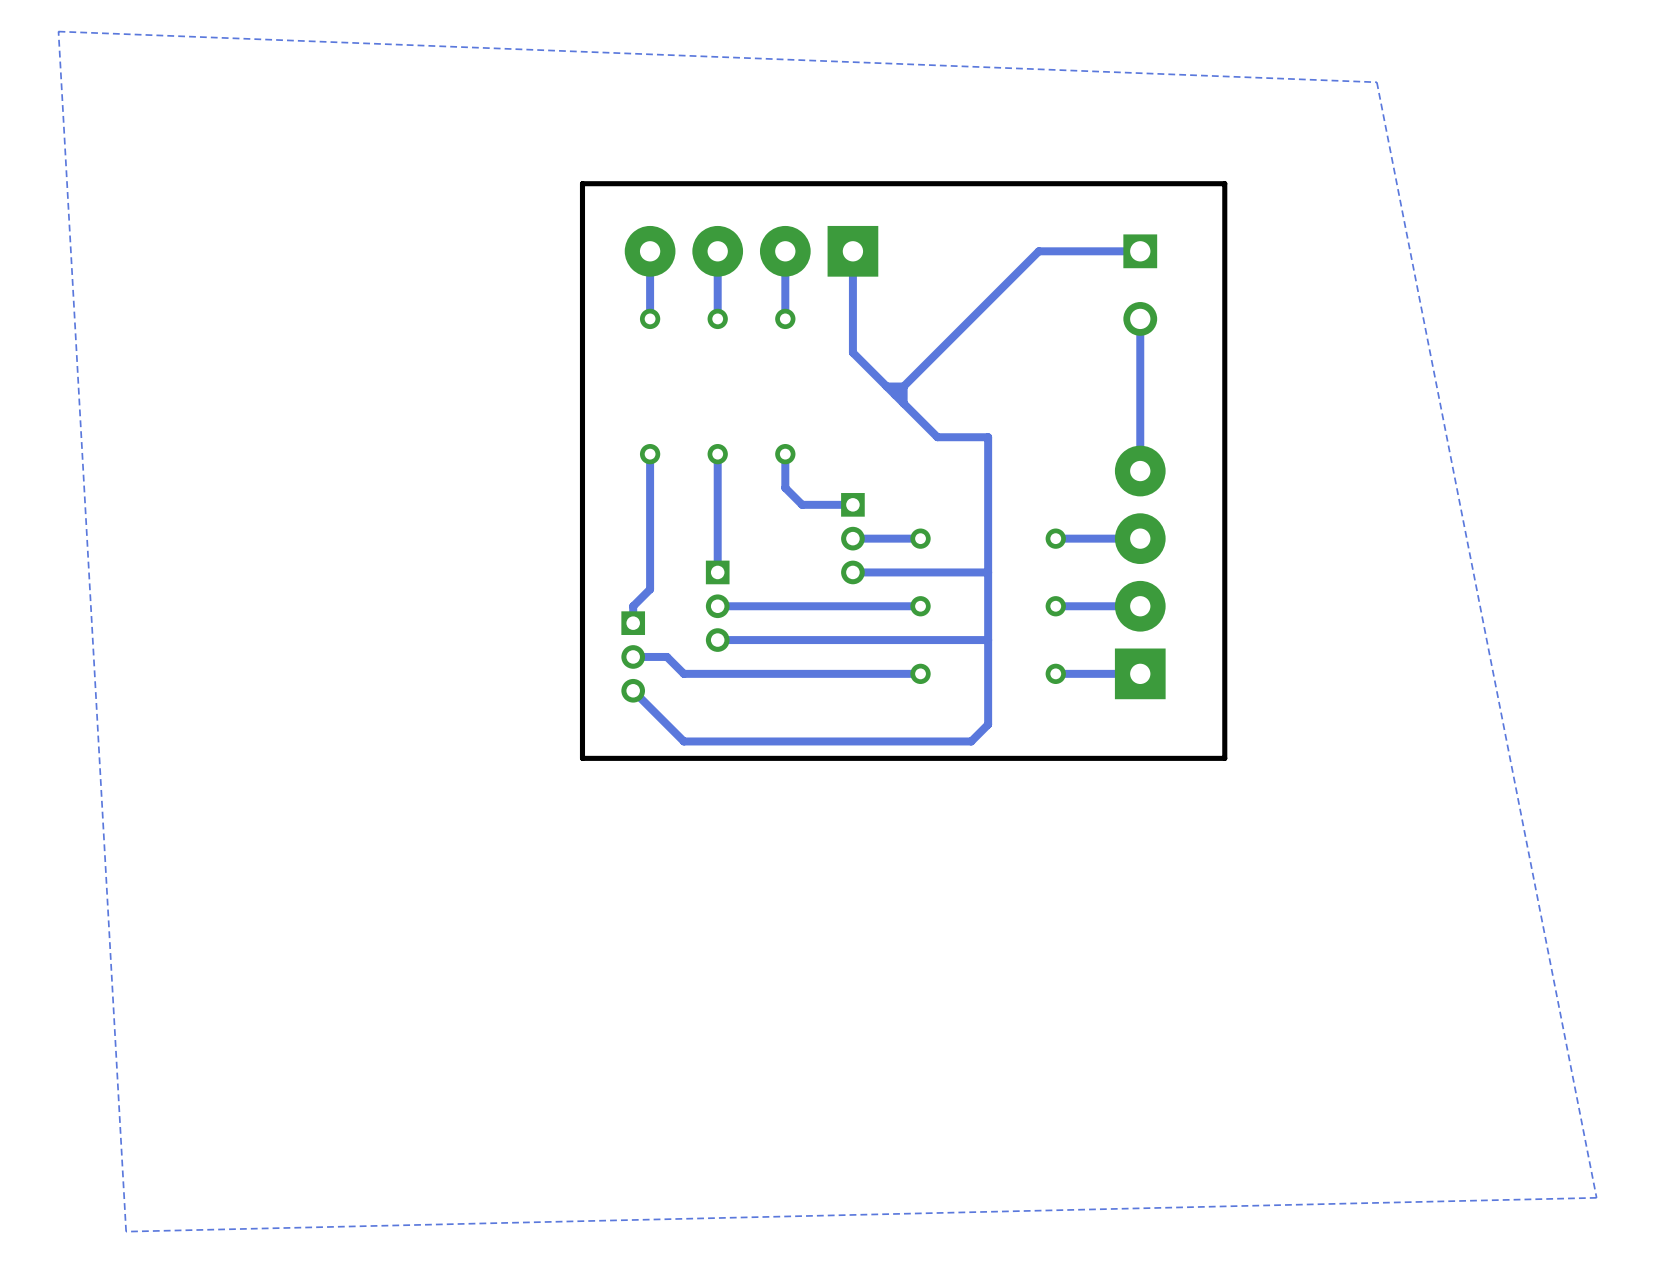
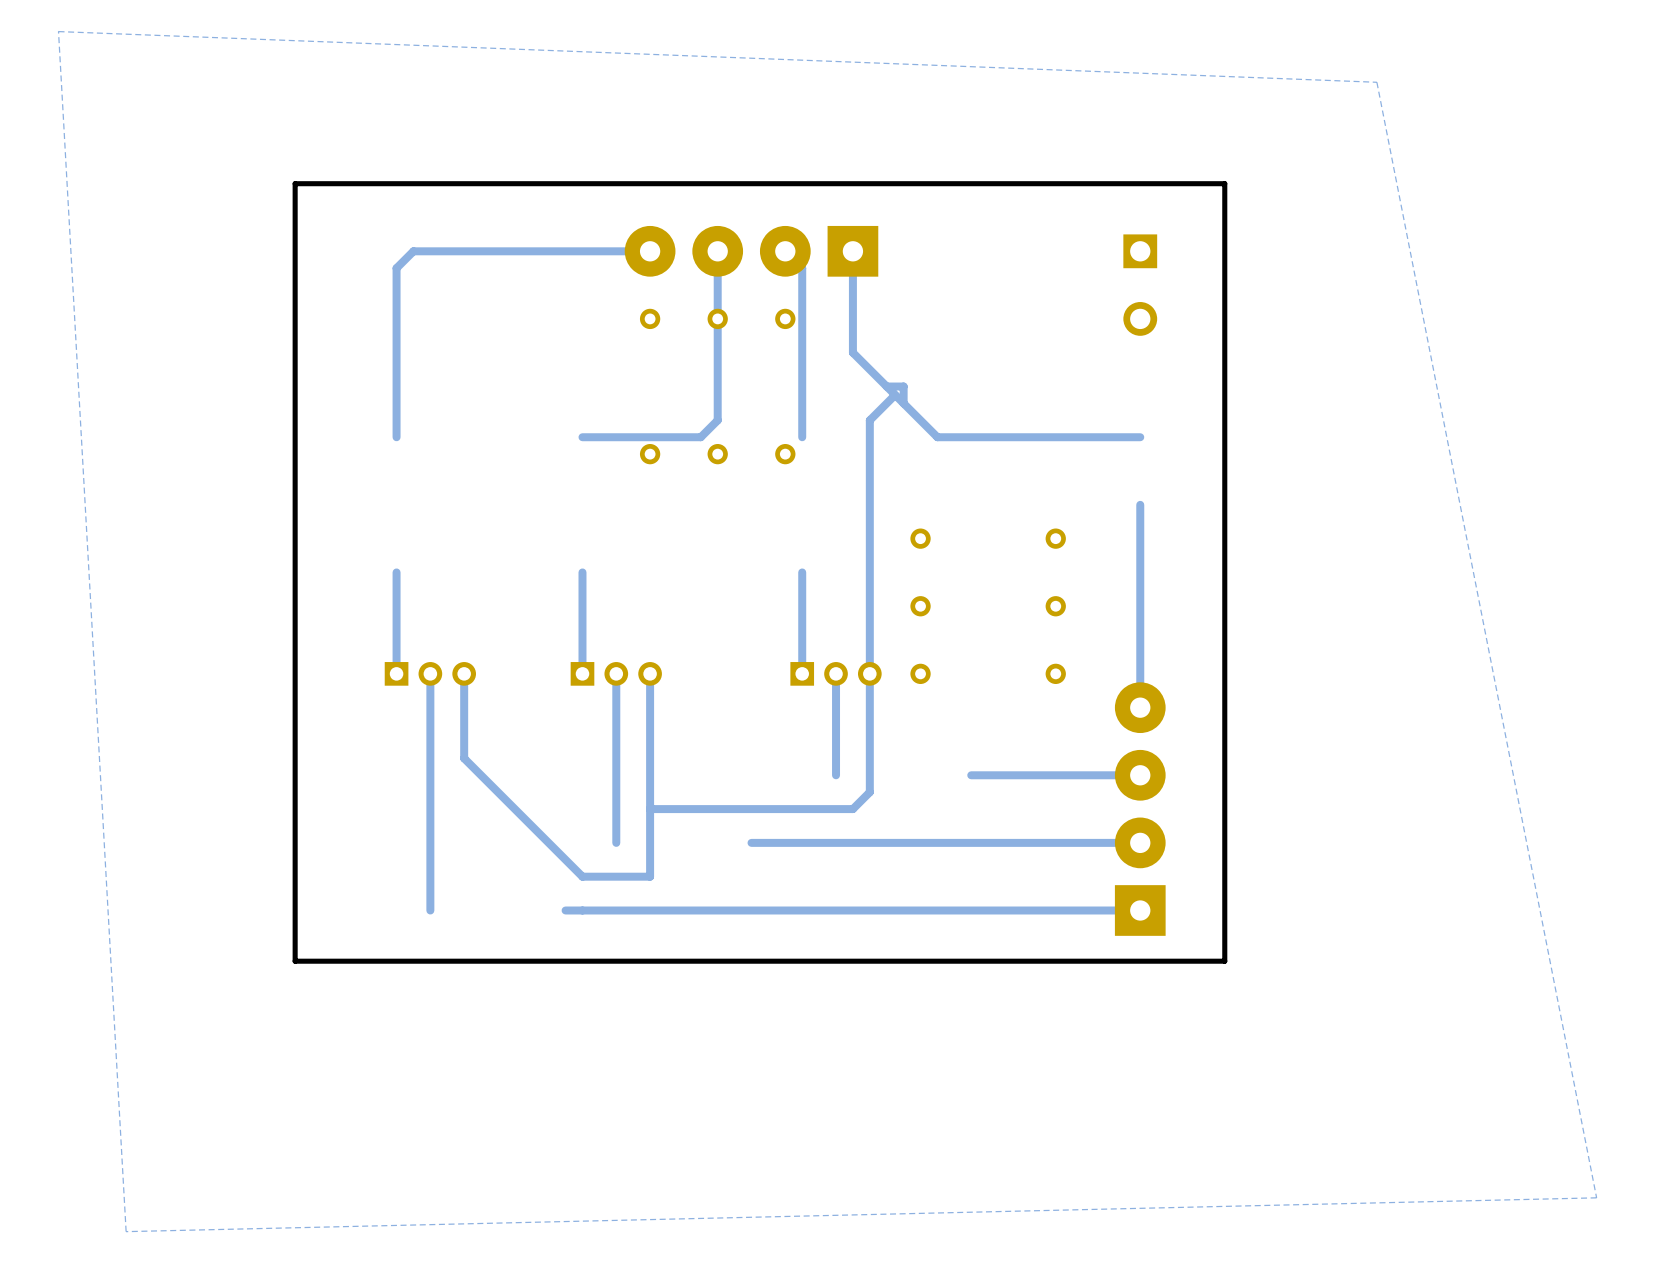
board edge: (582, 183) (582, 758) (1224, 758) -> (582, 183) (295, 183) (295, 961) (1224, 961) (1224, 758)
bottom track: (650, 251) (650, 318) -> (650, 251) (413, 251) (396, 268) (396, 437)
bottom track: (785, 251) (785, 318) -> (785, 251) (802, 268) (802, 437)
bottom track: (1140, 251) (1038, 251) (895, 394) -> (650, 809) (852, 809) (869, 792) (869, 420) (895, 394)
bottom track: none -> (717, 318) (717, 420) (700, 437) (582, 437)
bottom track: (1140, 318) (1140, 471) -> none
bottom track: (988, 437) (988, 724) (971, 741) (683, 741) (633, 690) -> (988, 437) (1140, 437)
bottom track: (650, 454) (650, 589) (633, 606) (633, 623) -> none
bottom track: (717, 454) (717, 572) -> none
bottom track: (785, 454) (785, 487) (802, 504) (852, 504) -> none
bottom track: none -> (1140, 504) (1140, 707)
part: (852, 538) -> none
bottom track: (920, 538) (852, 538) -> none
bottom track: (1140, 538) (1055, 538) -> none
bottom track: none -> (396, 572) (396, 673)
bottom track: none -> (582, 572) (582, 673)
bottom track: none -> (802, 572) (802, 673)
bottom track: (988, 572) (852, 572) -> none
part position: (1140, 572) -> (1140, 809)
part: (717, 606) -> none
bottom track: (920, 606) (717, 606) -> none
bottom track: (1140, 606) (1055, 606) -> none
bottom track: (988, 640) (717, 640) -> none
bottom track: (633, 656) (667, 656) (683, 673) (920, 673) -> none
part rotation: 0° (633, 656) -> 90° counterclockwise (616, 673)
bottom track: none -> (430, 673) (430, 910)
part: none -> (430, 673)
bottom track: none -> (616, 673) (616, 842)
bottom track: none -> (650, 673) (650, 876) (582, 876) (464, 758) (464, 673)
bottom track: none -> (836, 673) (836, 775)
part: none -> (836, 673)
bottom track: (1140, 673) (1055, 673) -> none
bottom track: none -> (1140, 775) (971, 775)
bottom track: none -> (1140, 842) (751, 842)
bottom track: none -> (1140, 910) (565, 910)

